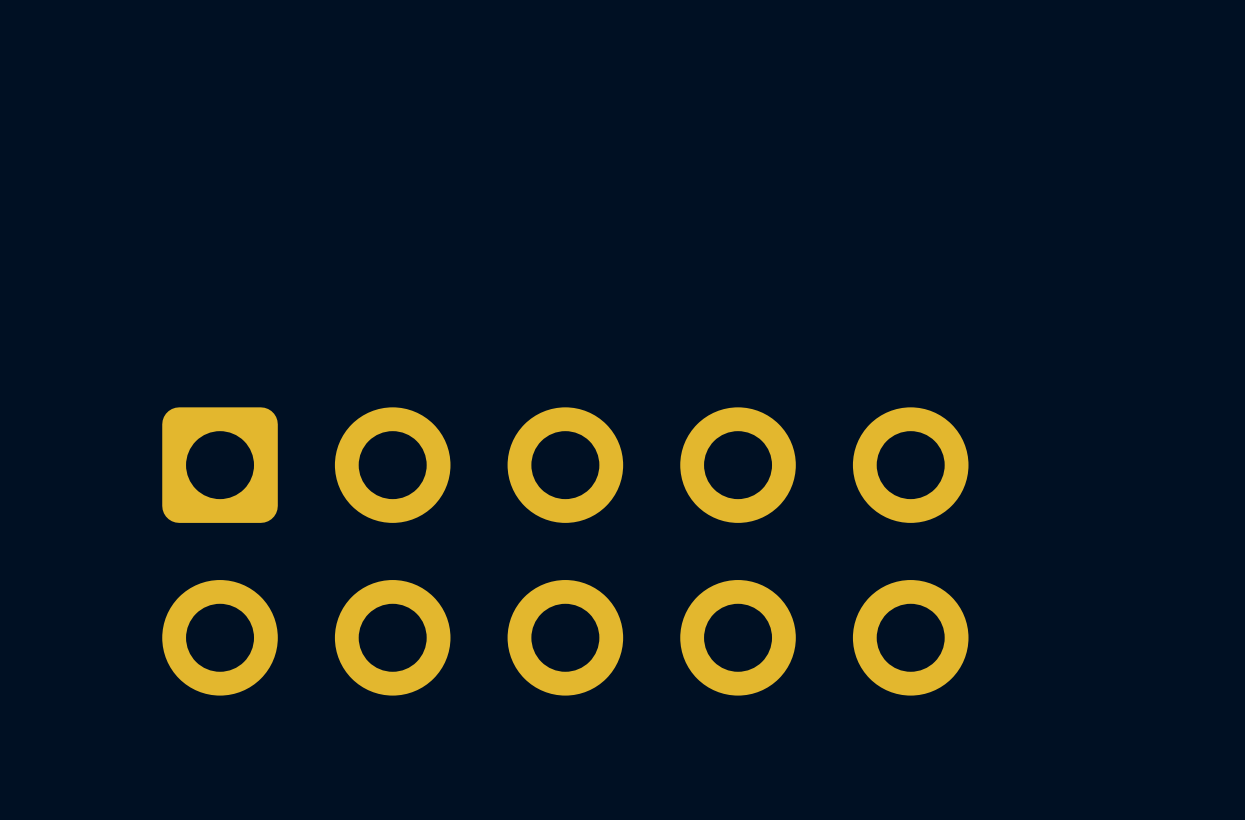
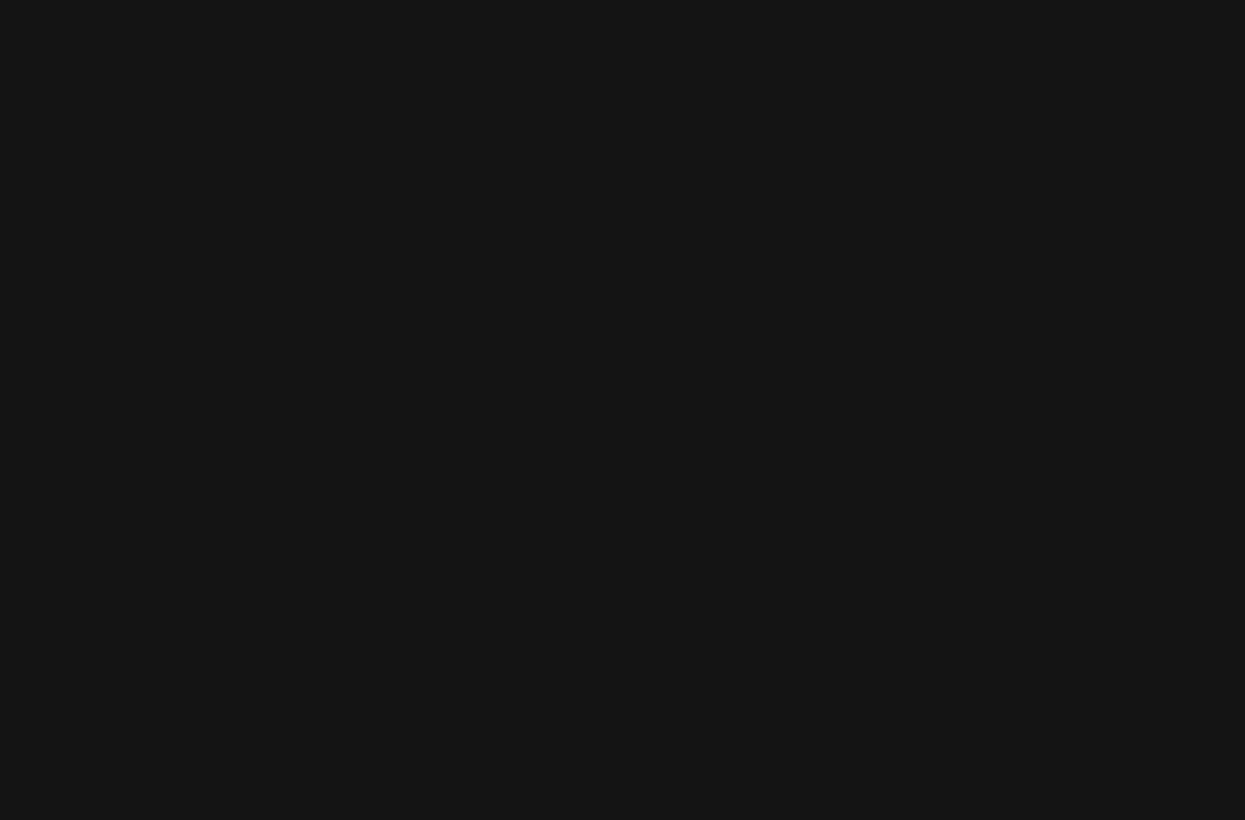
part: (565, 551) -> none

